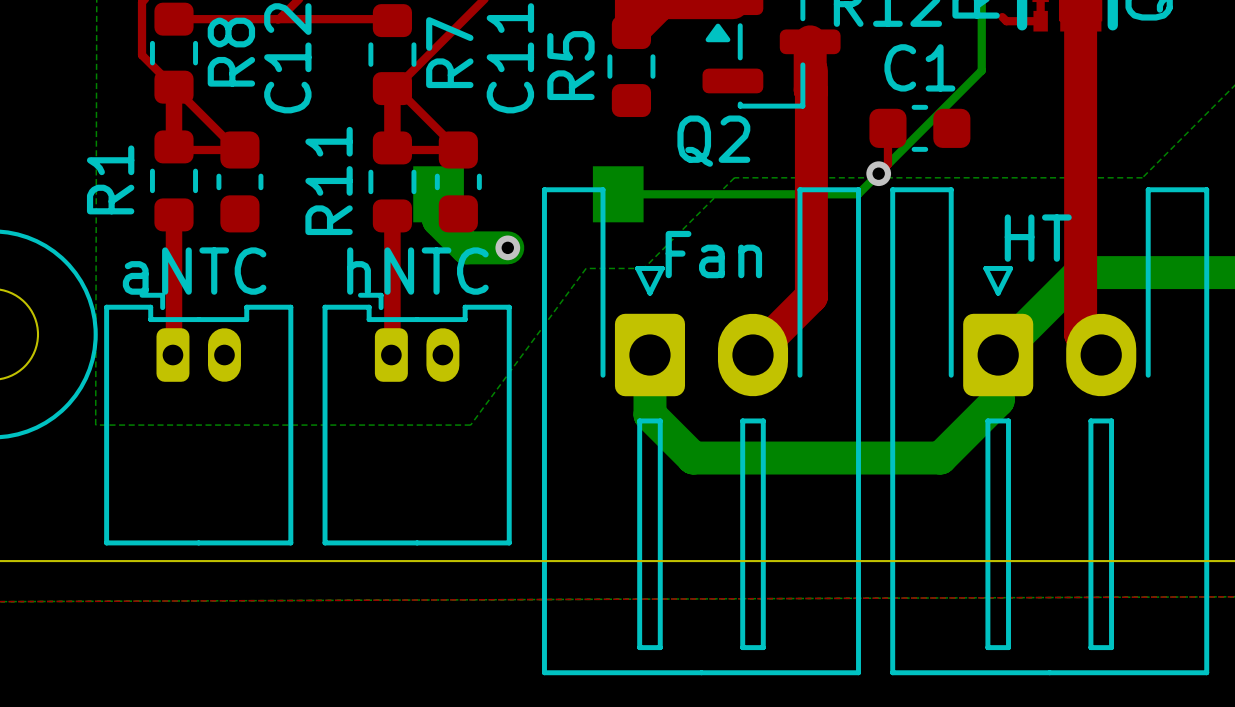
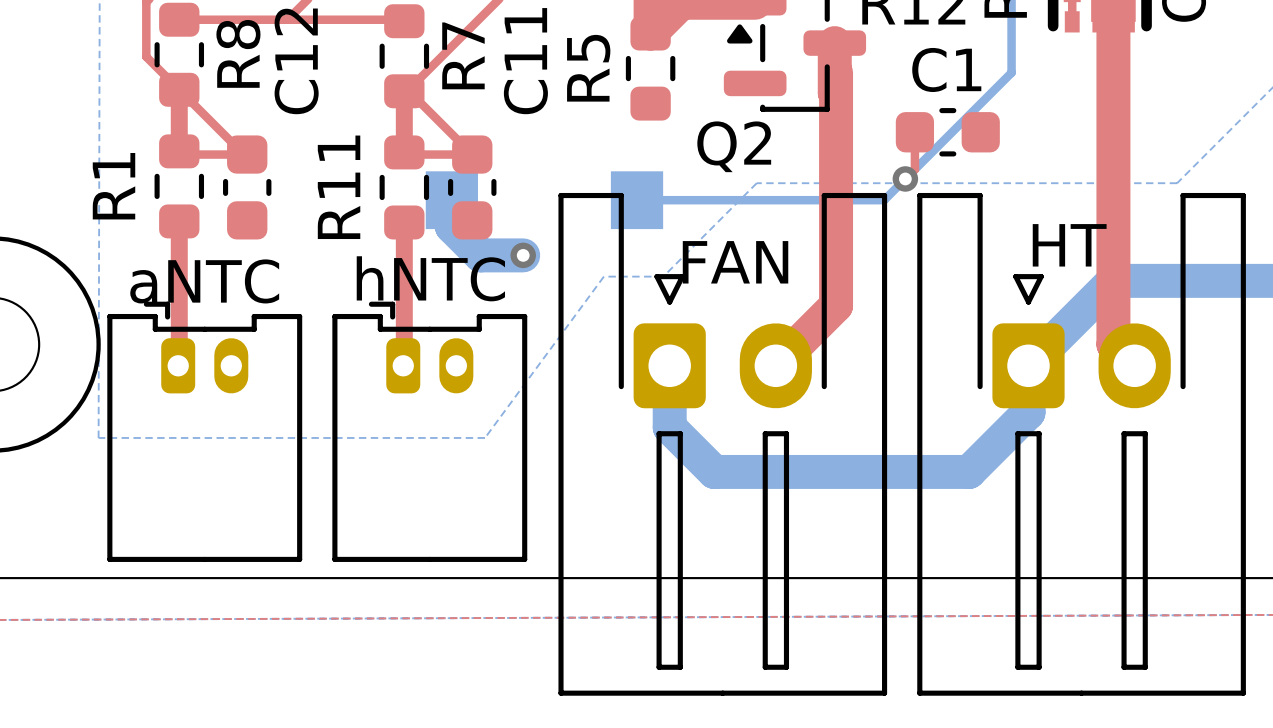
top track: (1002, 17) (1006, 21) (1040, 21) -> none
FAN name: none -> FAN (735, 262)
FAN value: Fan (713, 254) -> none
aNTC value: aNTC (194, 271) -> none
hNTC value: hNTC (417, 271) -> none
hNTC name: none -> hNTC (430, 278)
aNTC name: none -> aNTC (204, 281)

